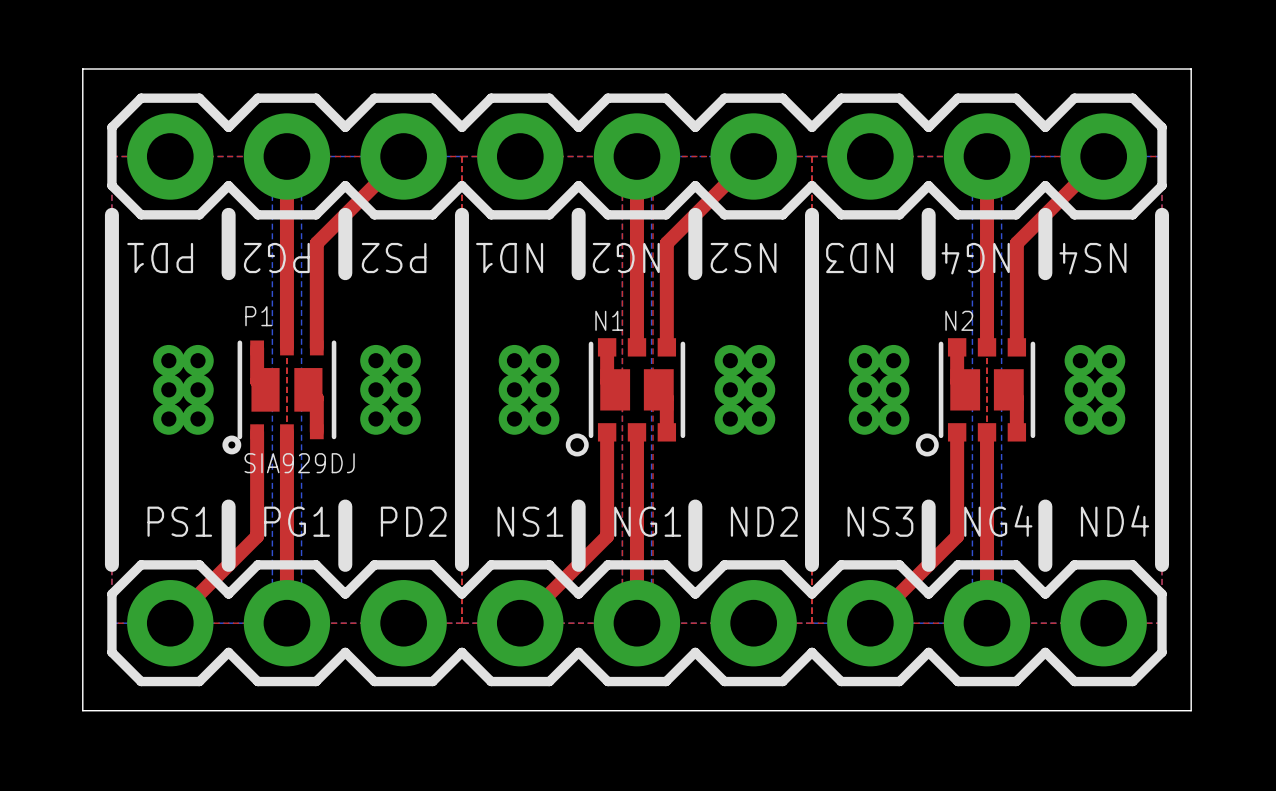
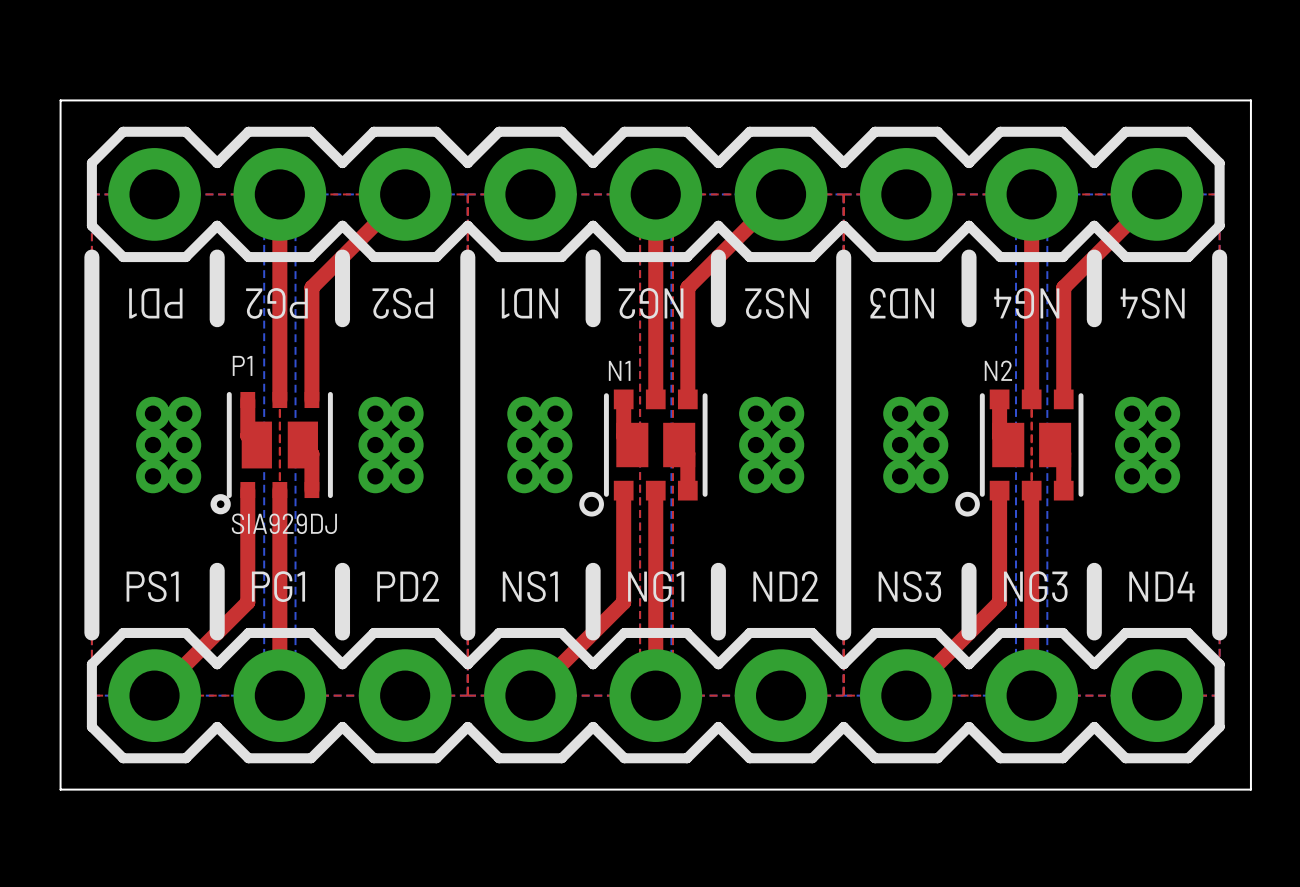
text: NG4 (998, 521) -> NG3 (1035, 586)

